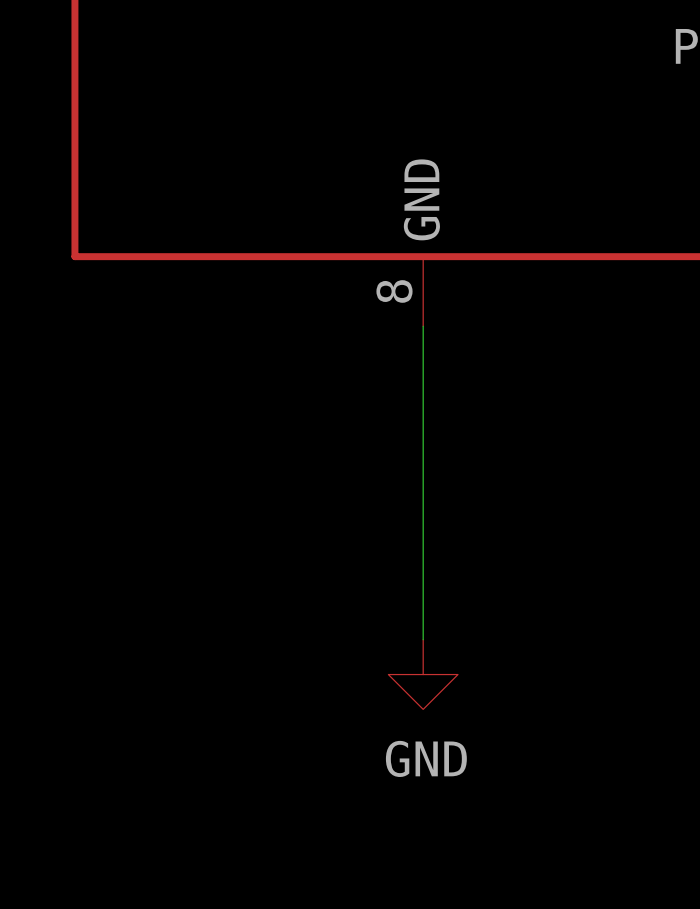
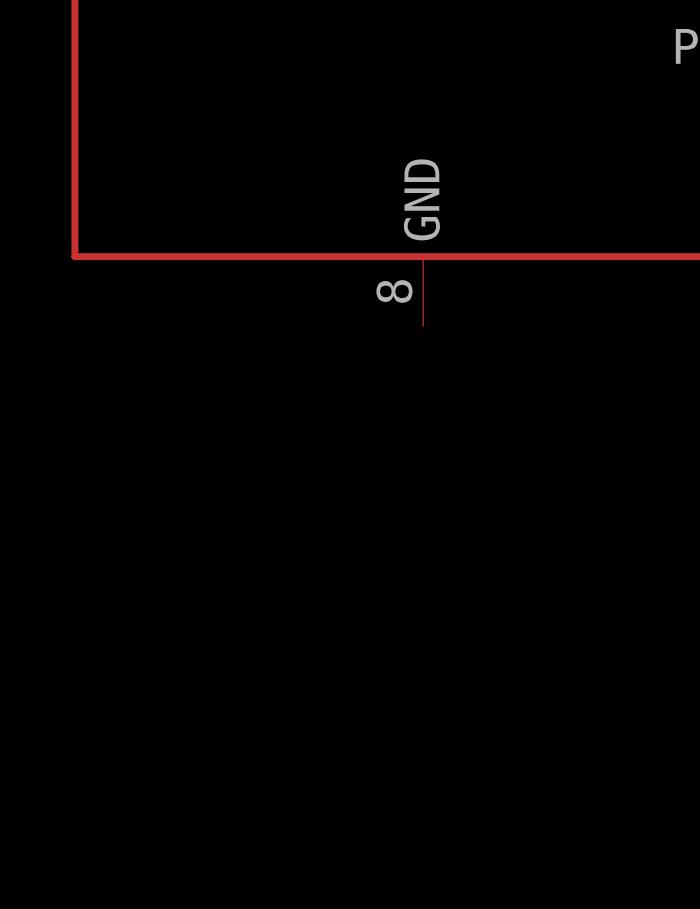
wire: (423, 326) (423, 639) -> none
power symbol: GND (423, 674) -> none

